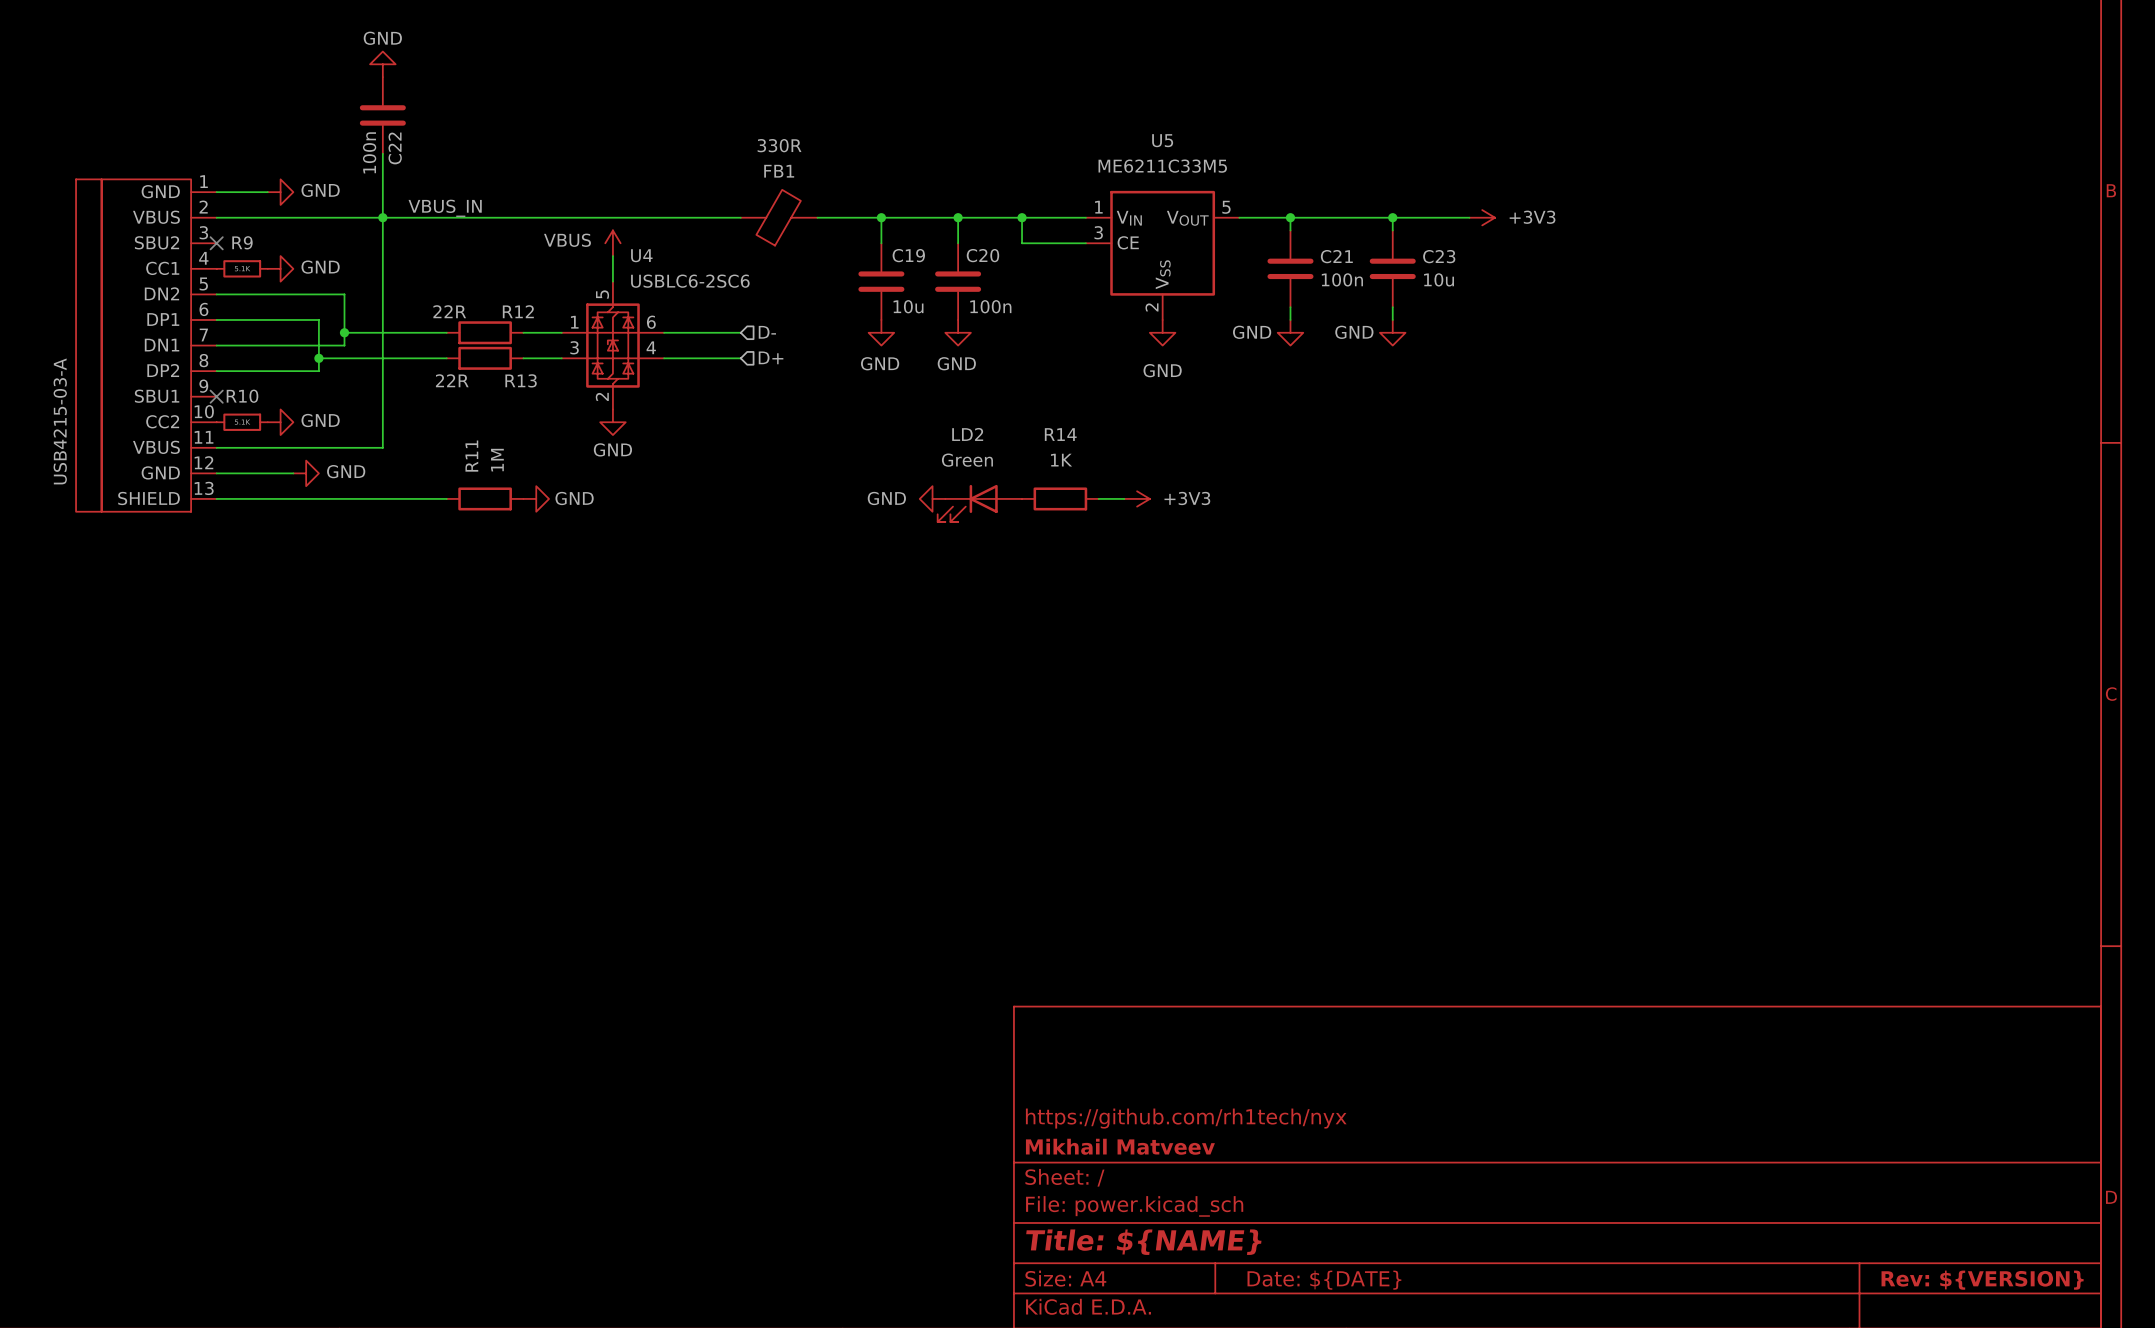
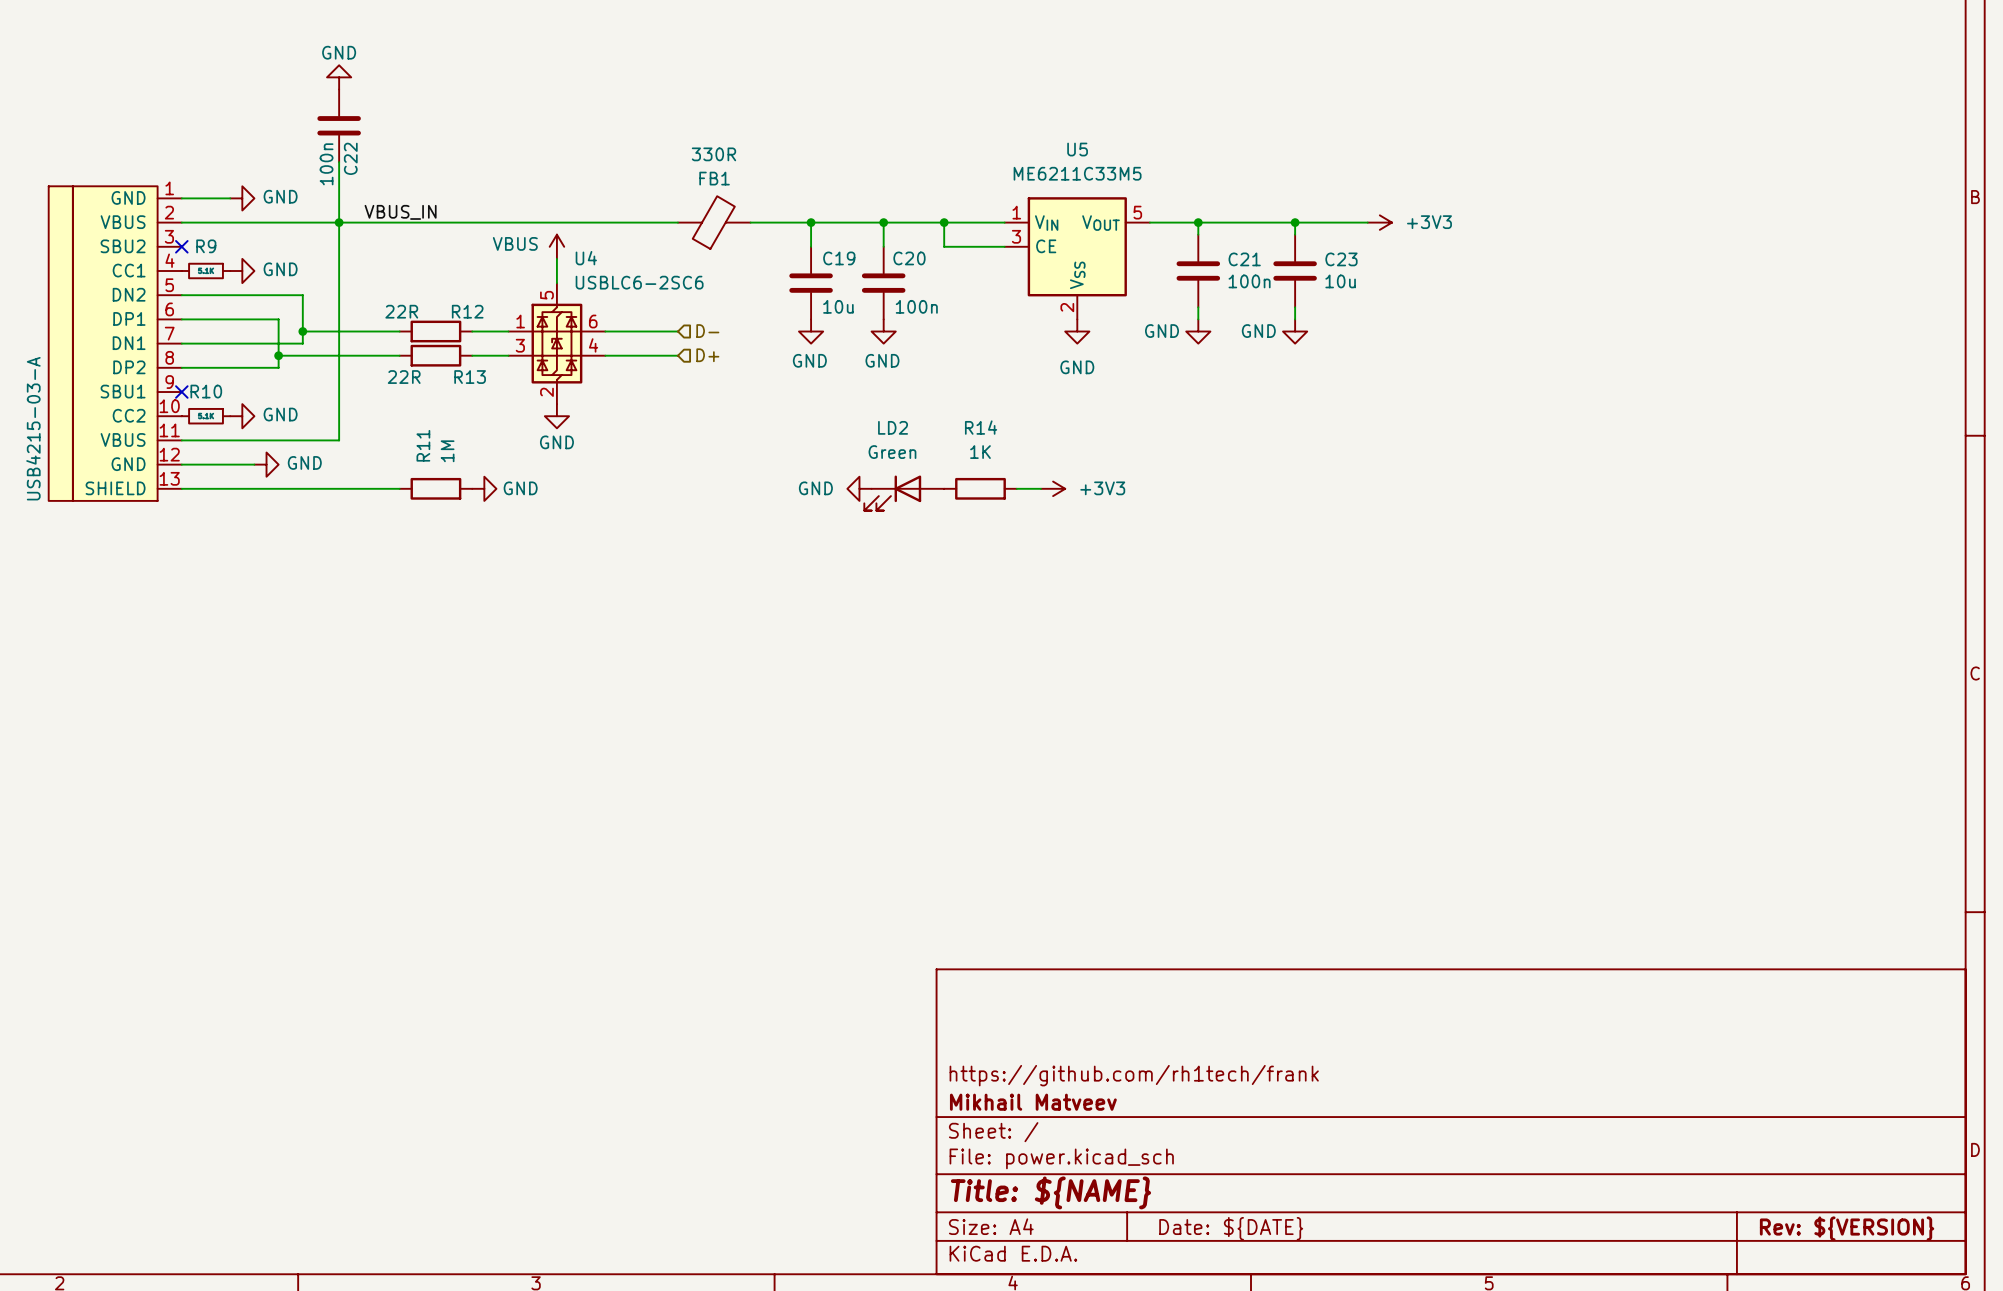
title block: https://github.com/rh1tech/nyx (1186, 1118) -> https://github.com/rh1tech/frank (1134, 1075)

